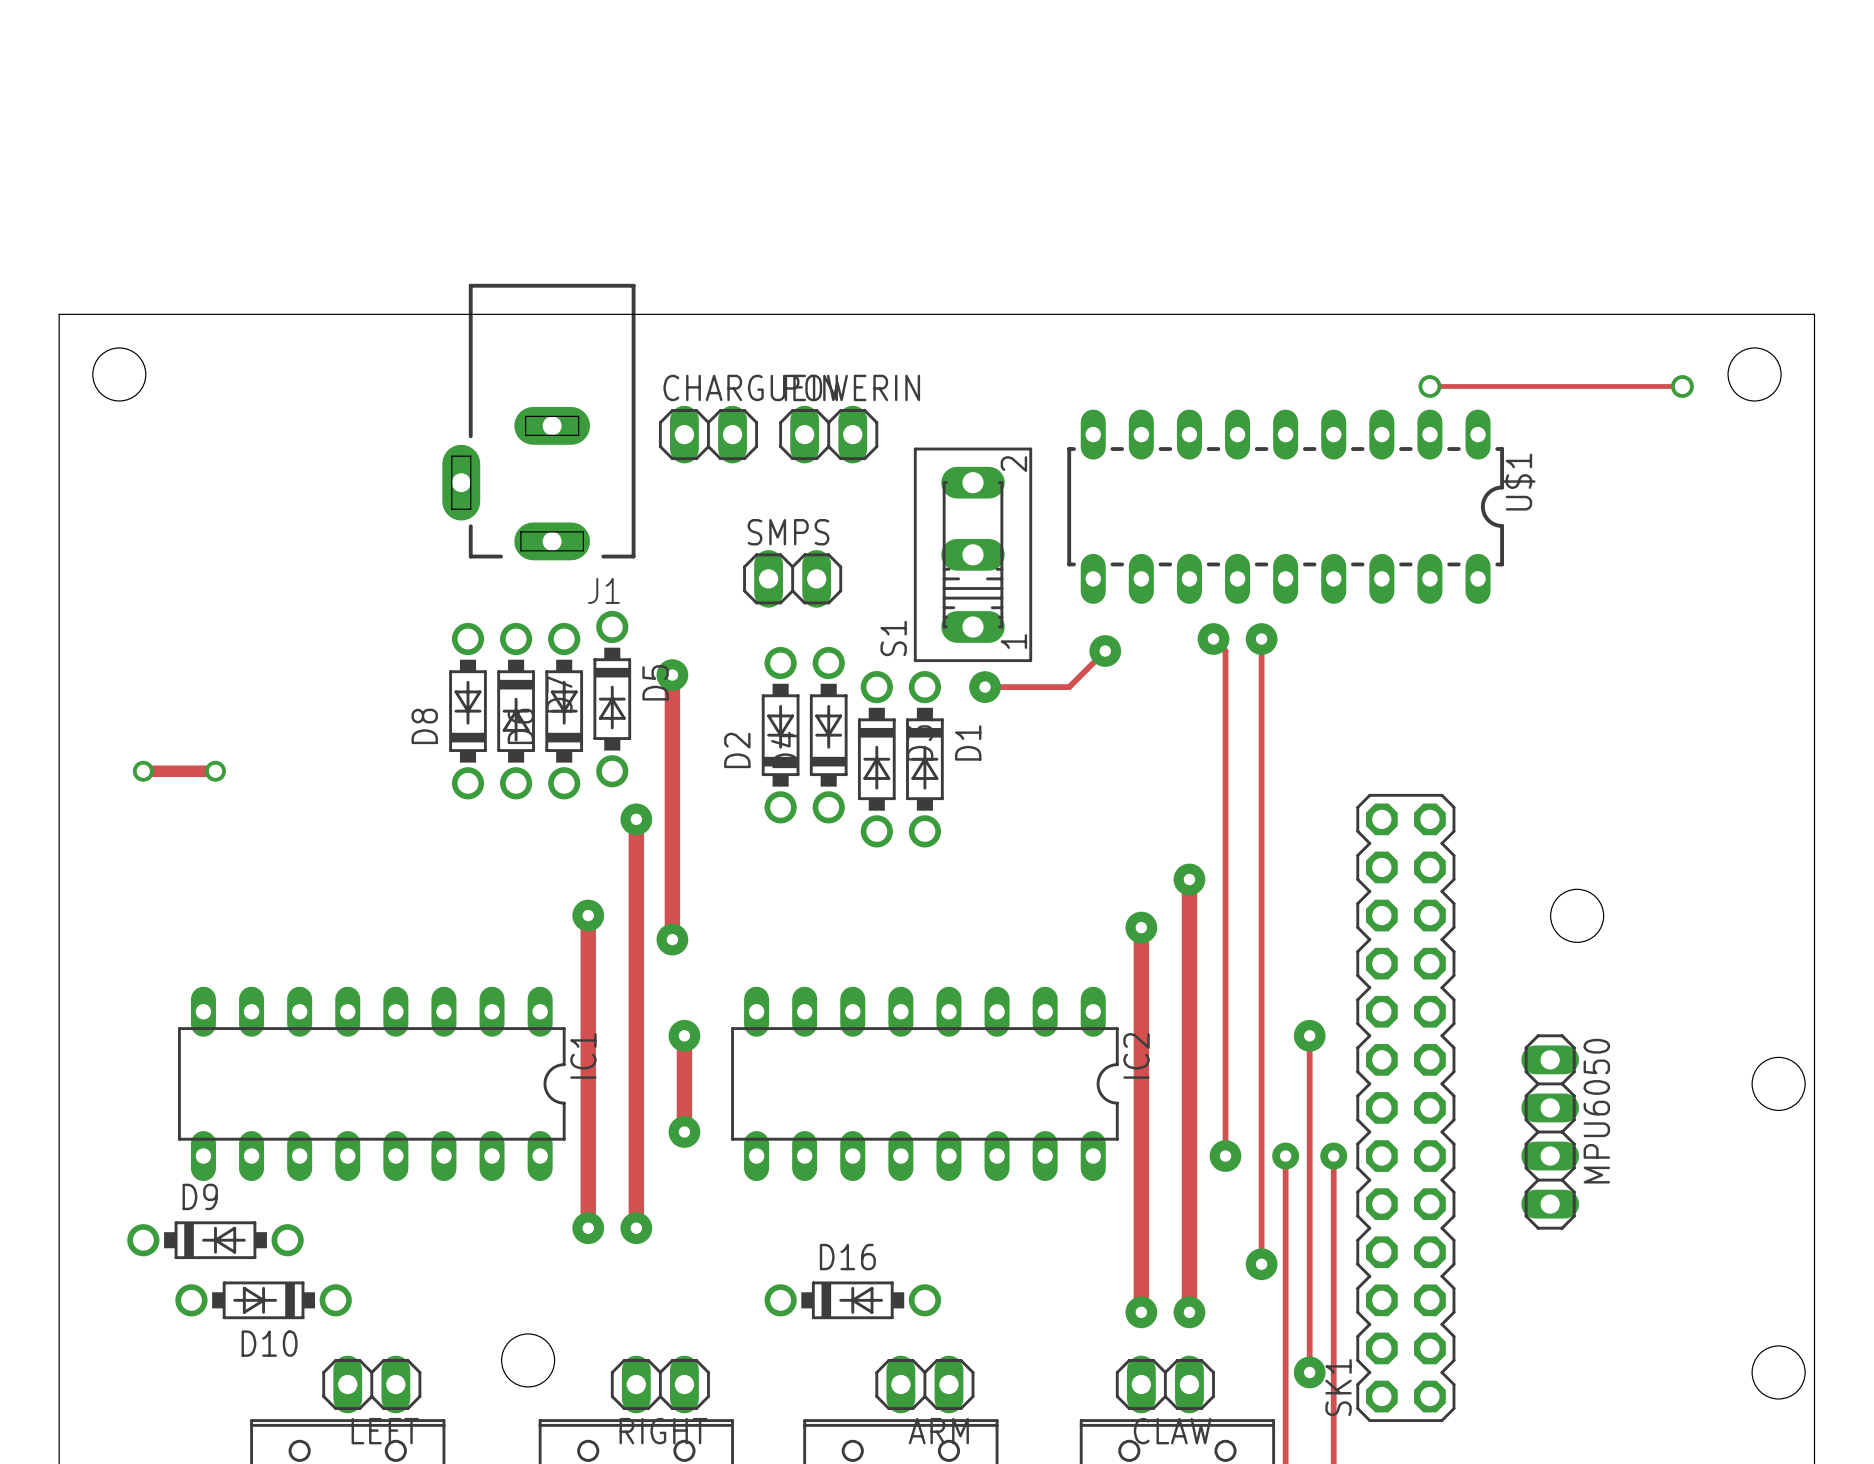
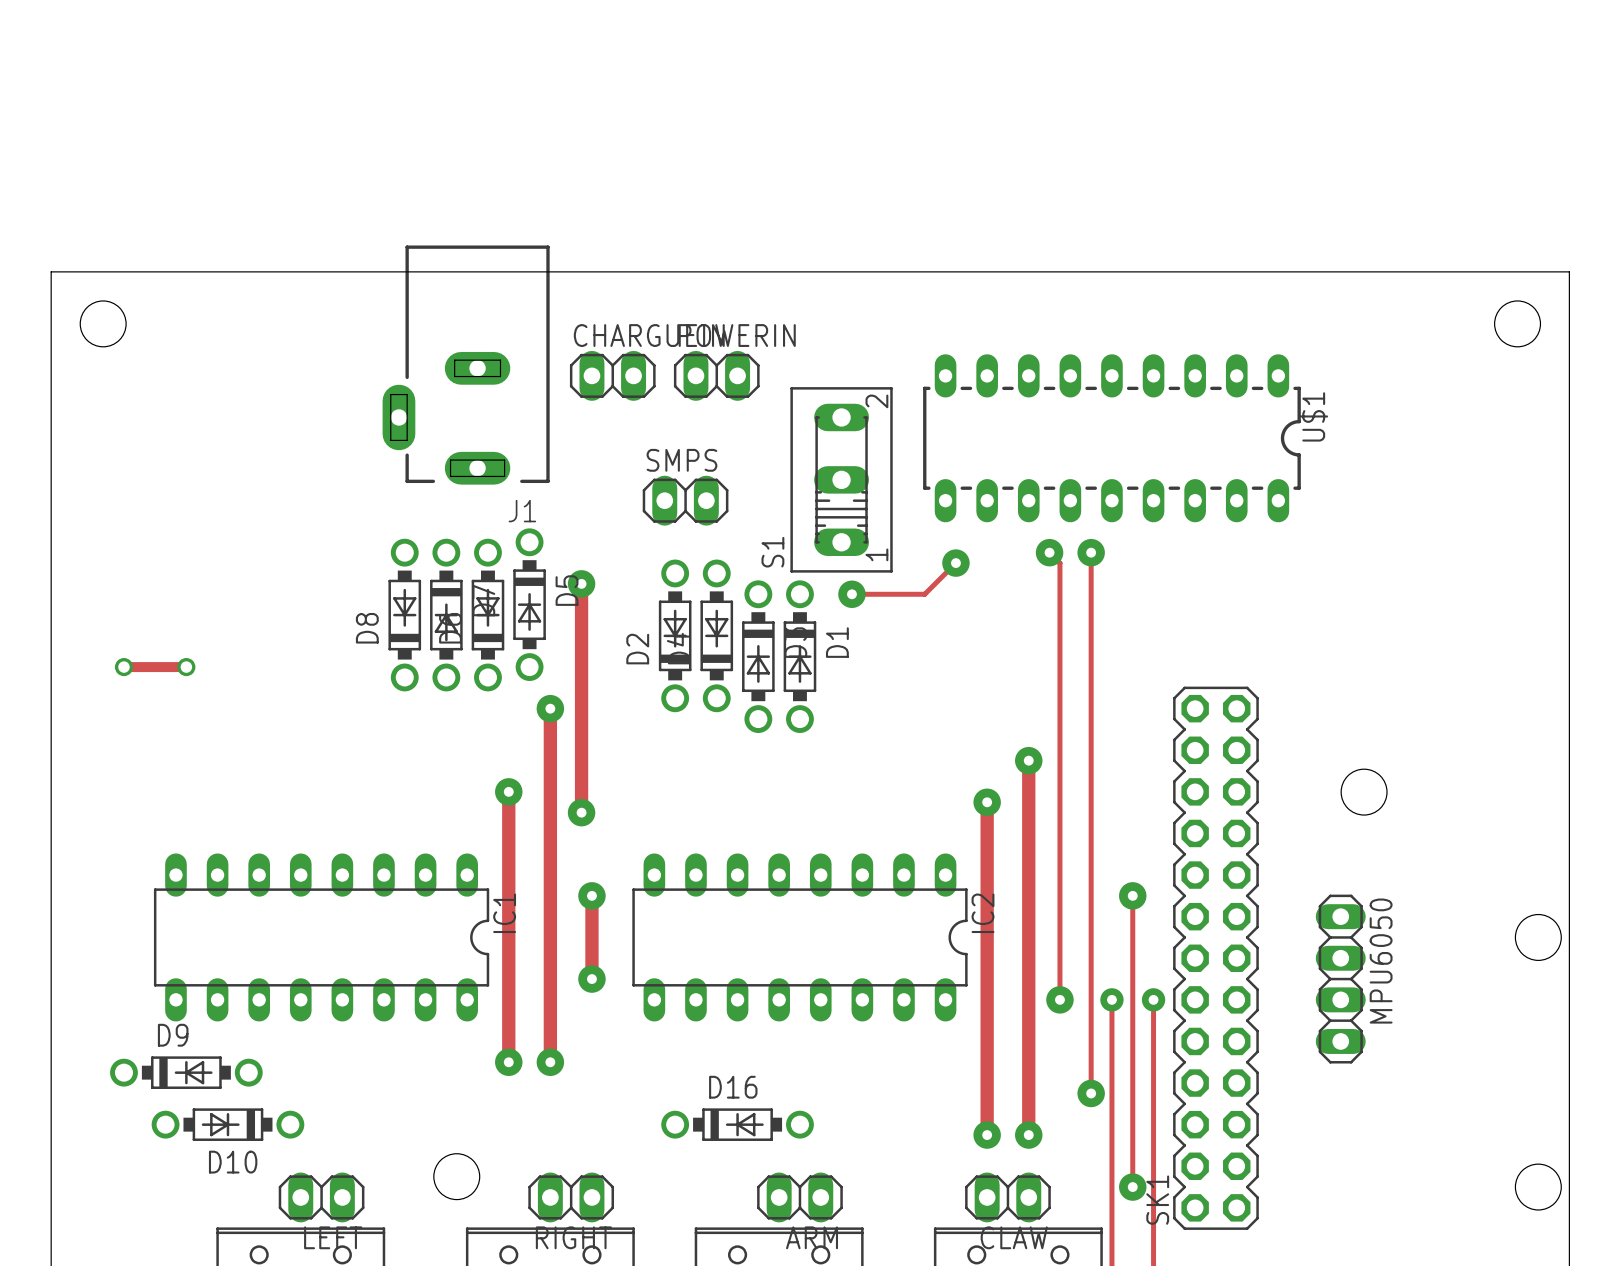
track: (1429, 386) (1682, 386) -> none
via: (1429, 386) -> none
via: (1682, 386) -> none

